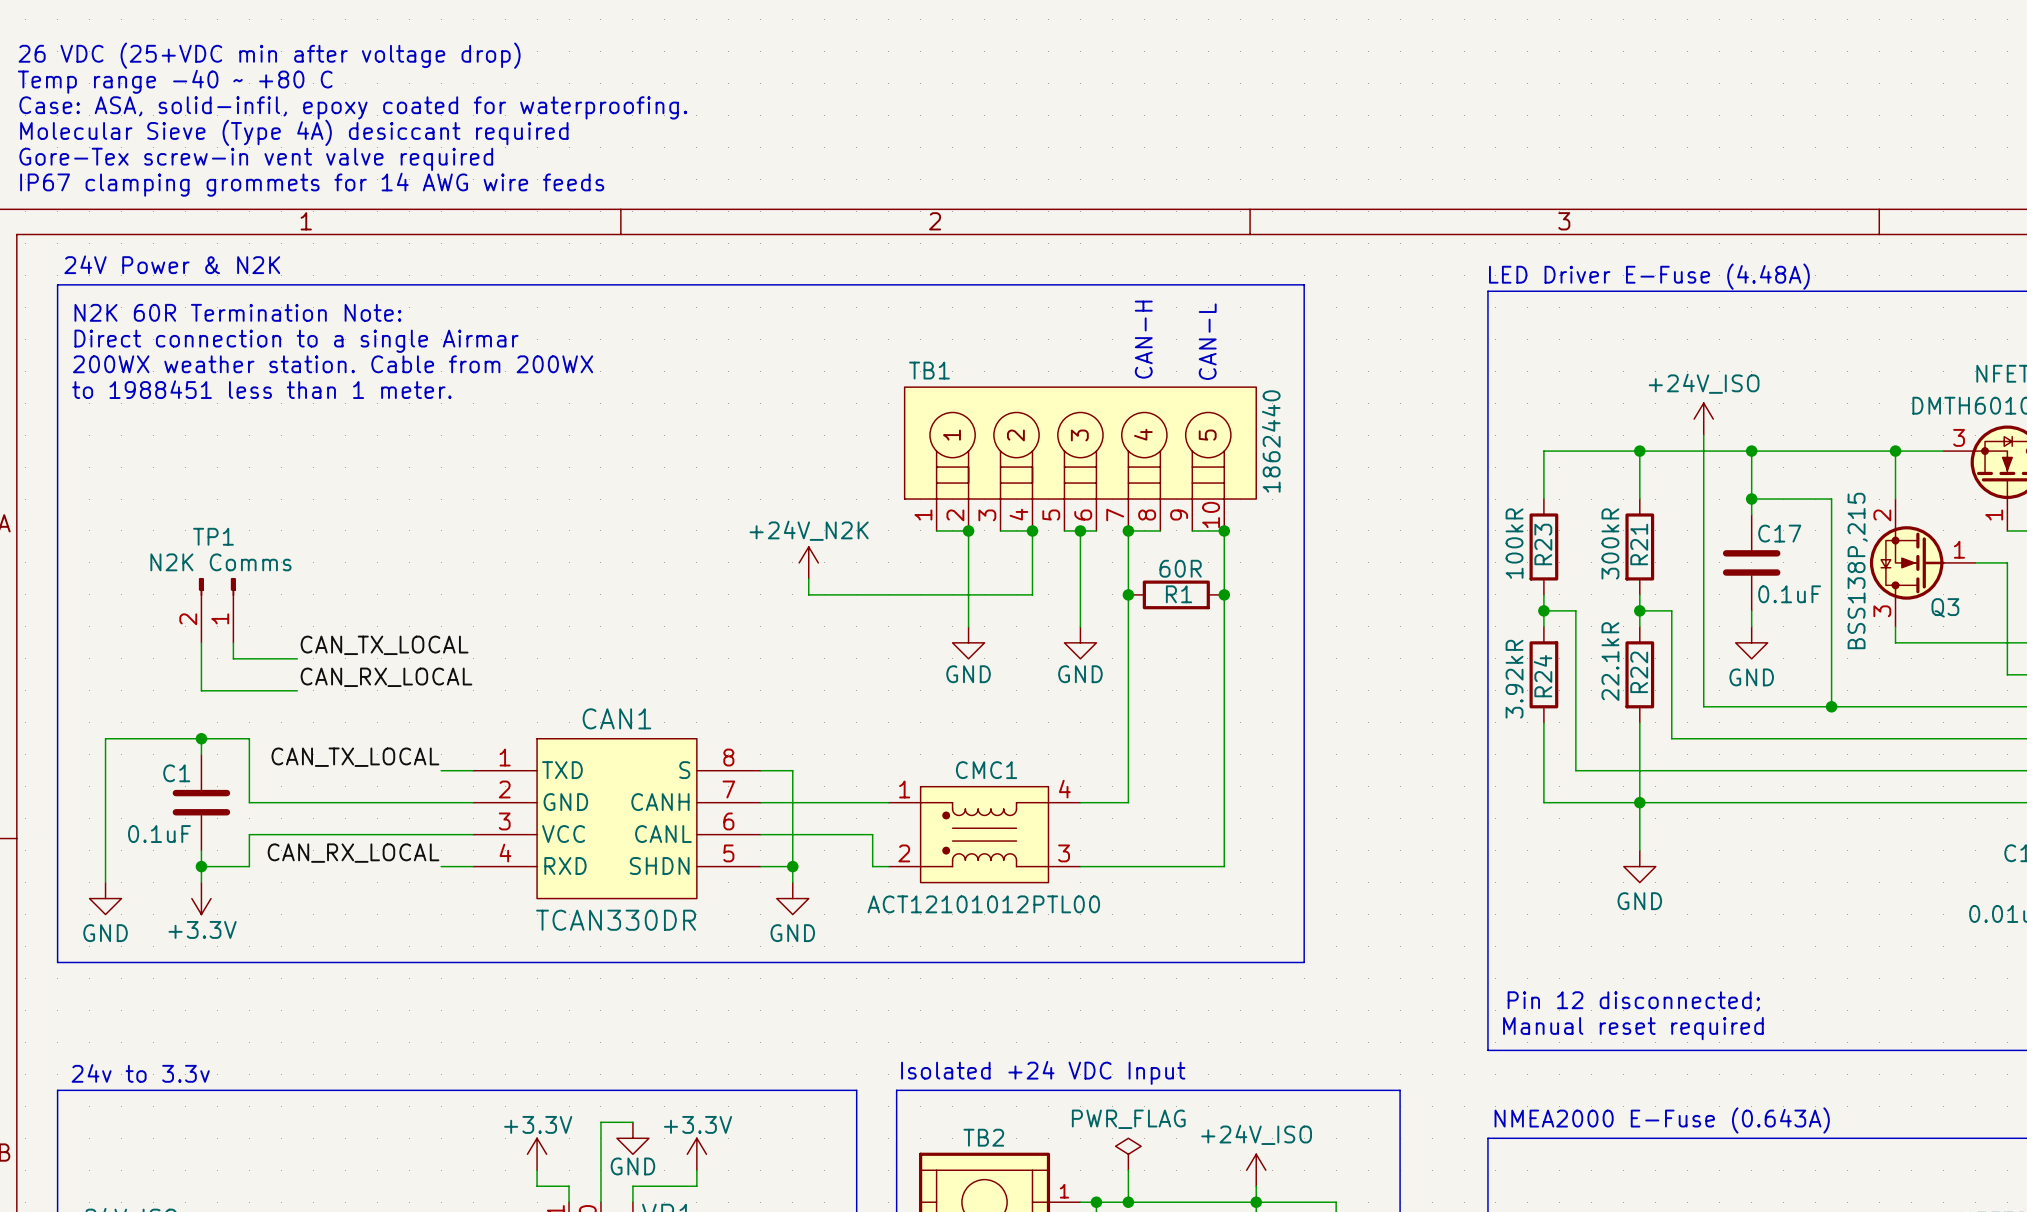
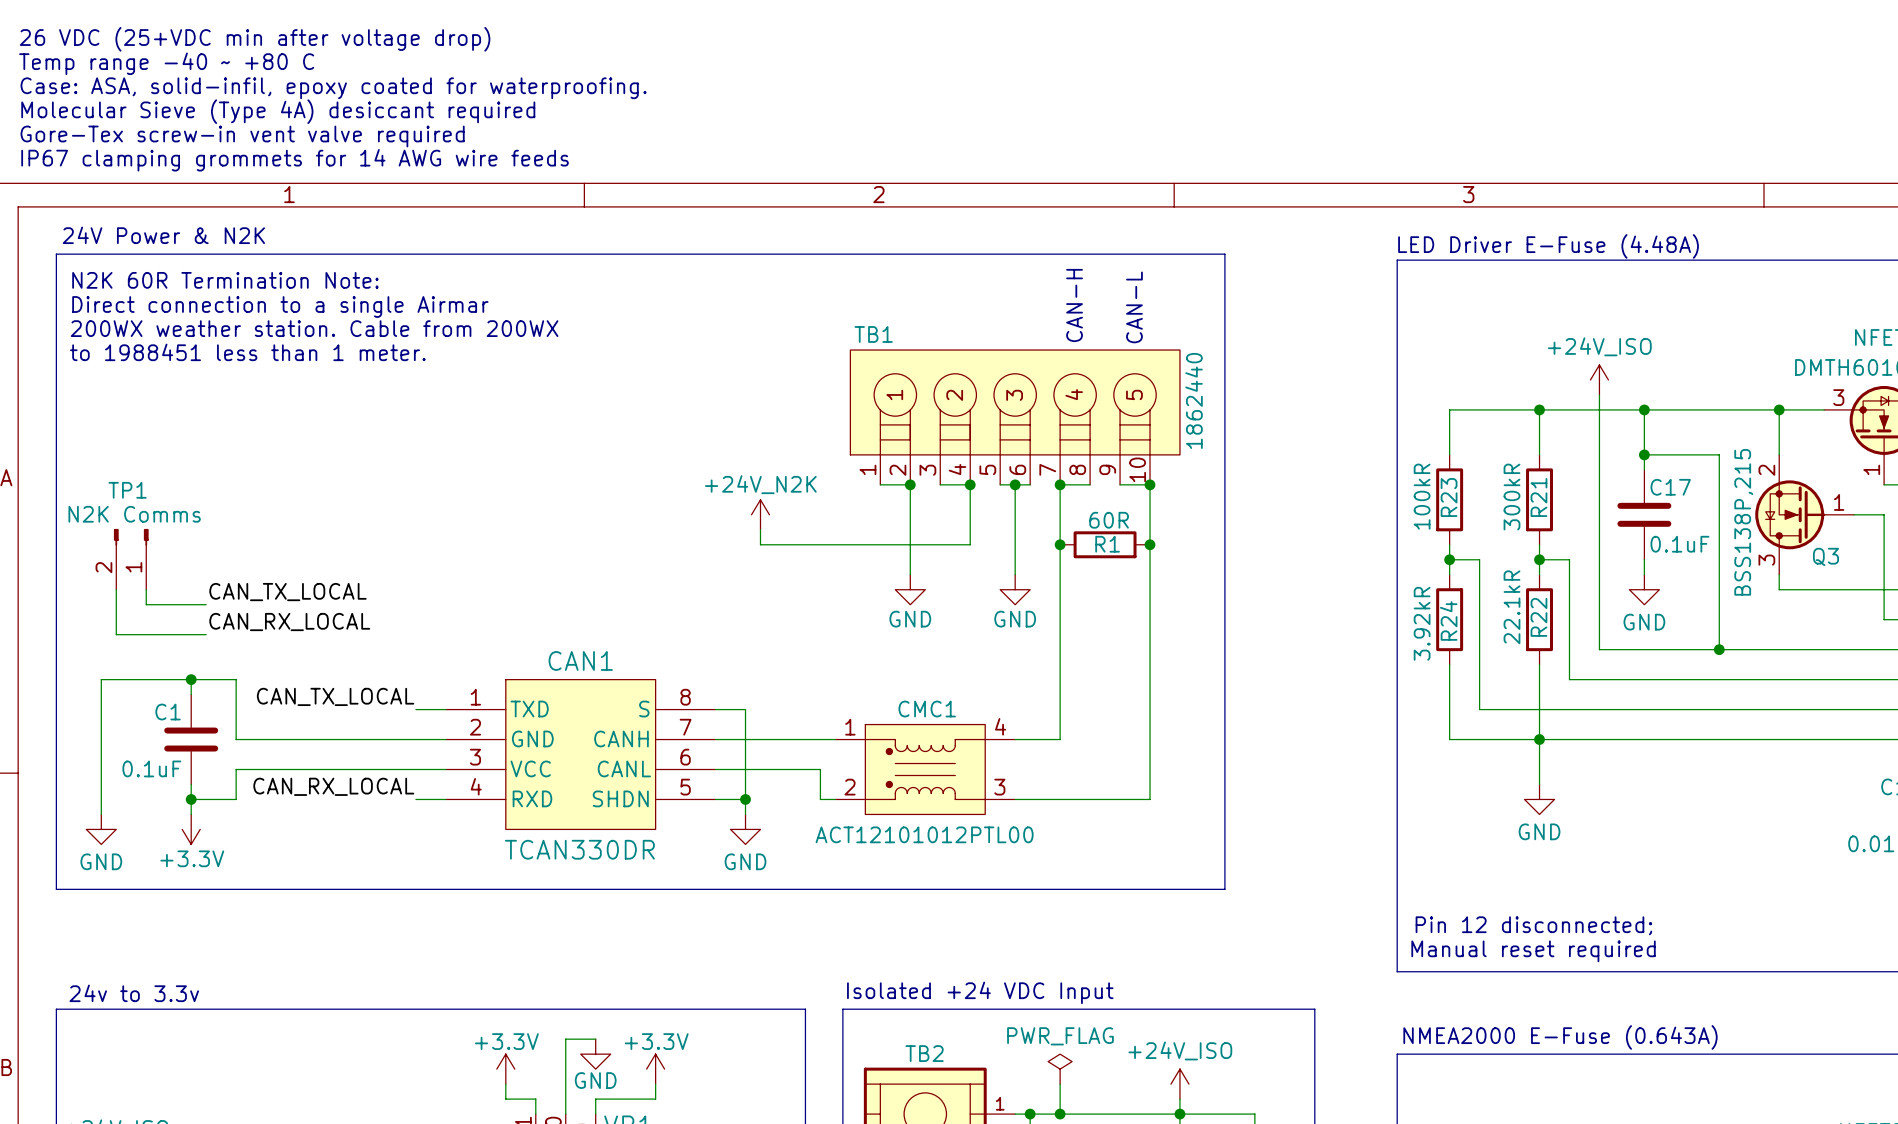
TP1 position: (217, 610) -> (131, 559)
wire: (201, 642) (201, 690) -> (116, 589) (116, 634) (191, 634)
wire: (233, 642) (233, 658) (297, 658) -> (146, 589) (146, 604) (206, 604)
label position: CAN_TX_LOCAL (384, 645) -> CAN_TX_LOCAL (287, 592)
label position: CAN_RX_LOCAL (386, 677) -> CAN_RX_LOCAL (289, 622)
wire: (217, 690) (297, 690) -> none

